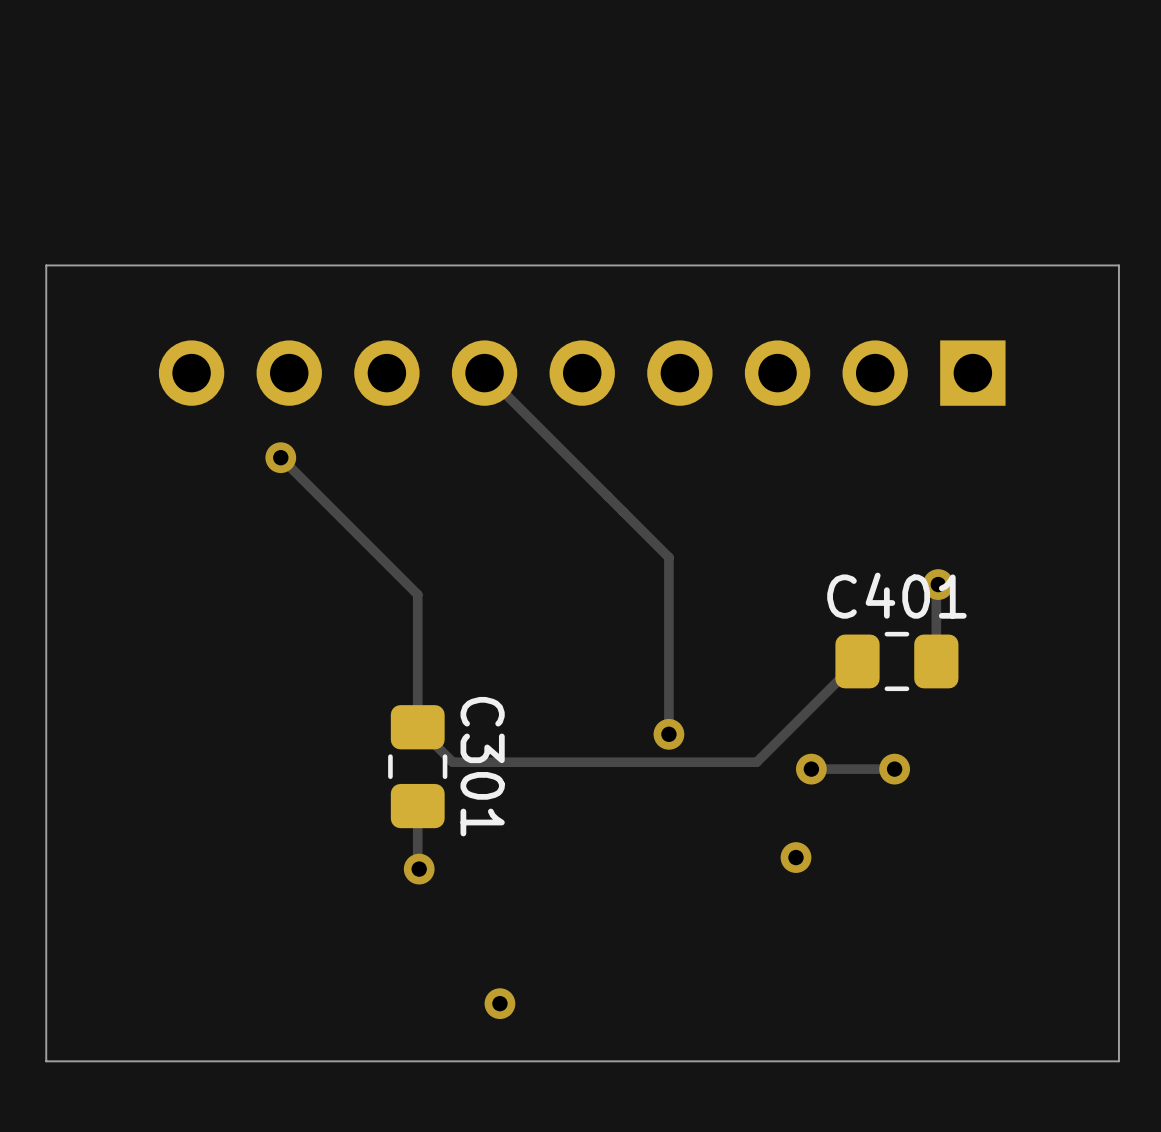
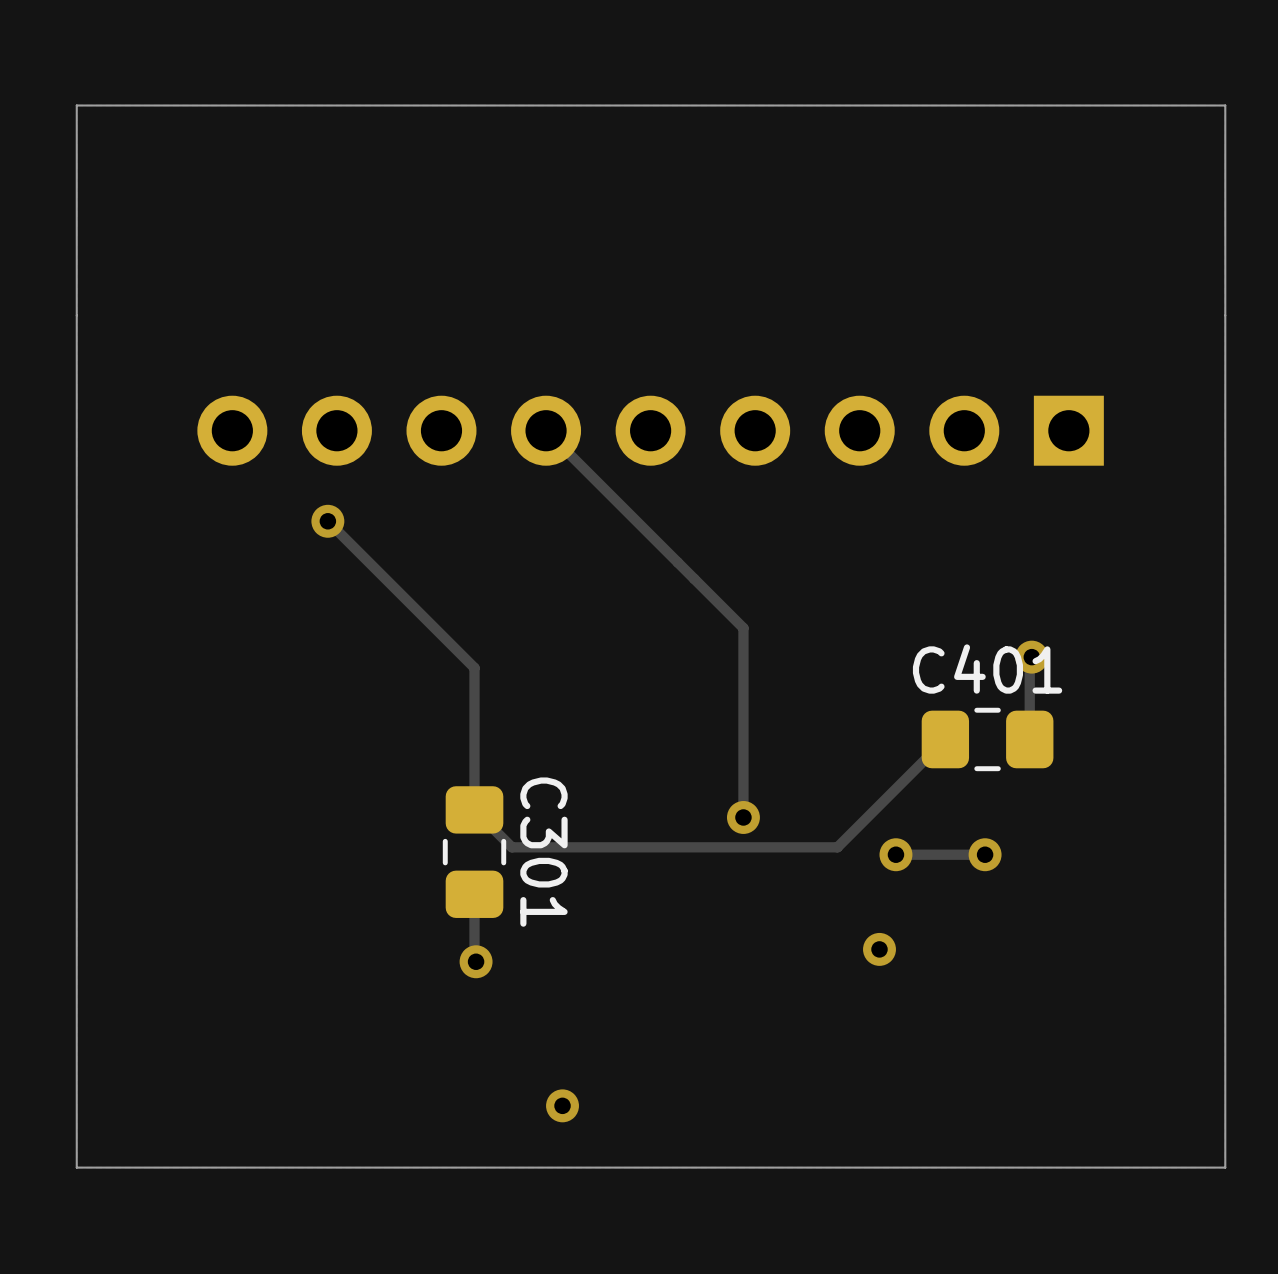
board edge: (1118, 265) (46, 265) -> (1225, 315) (1225, 105) (76, 105) (76, 315)

